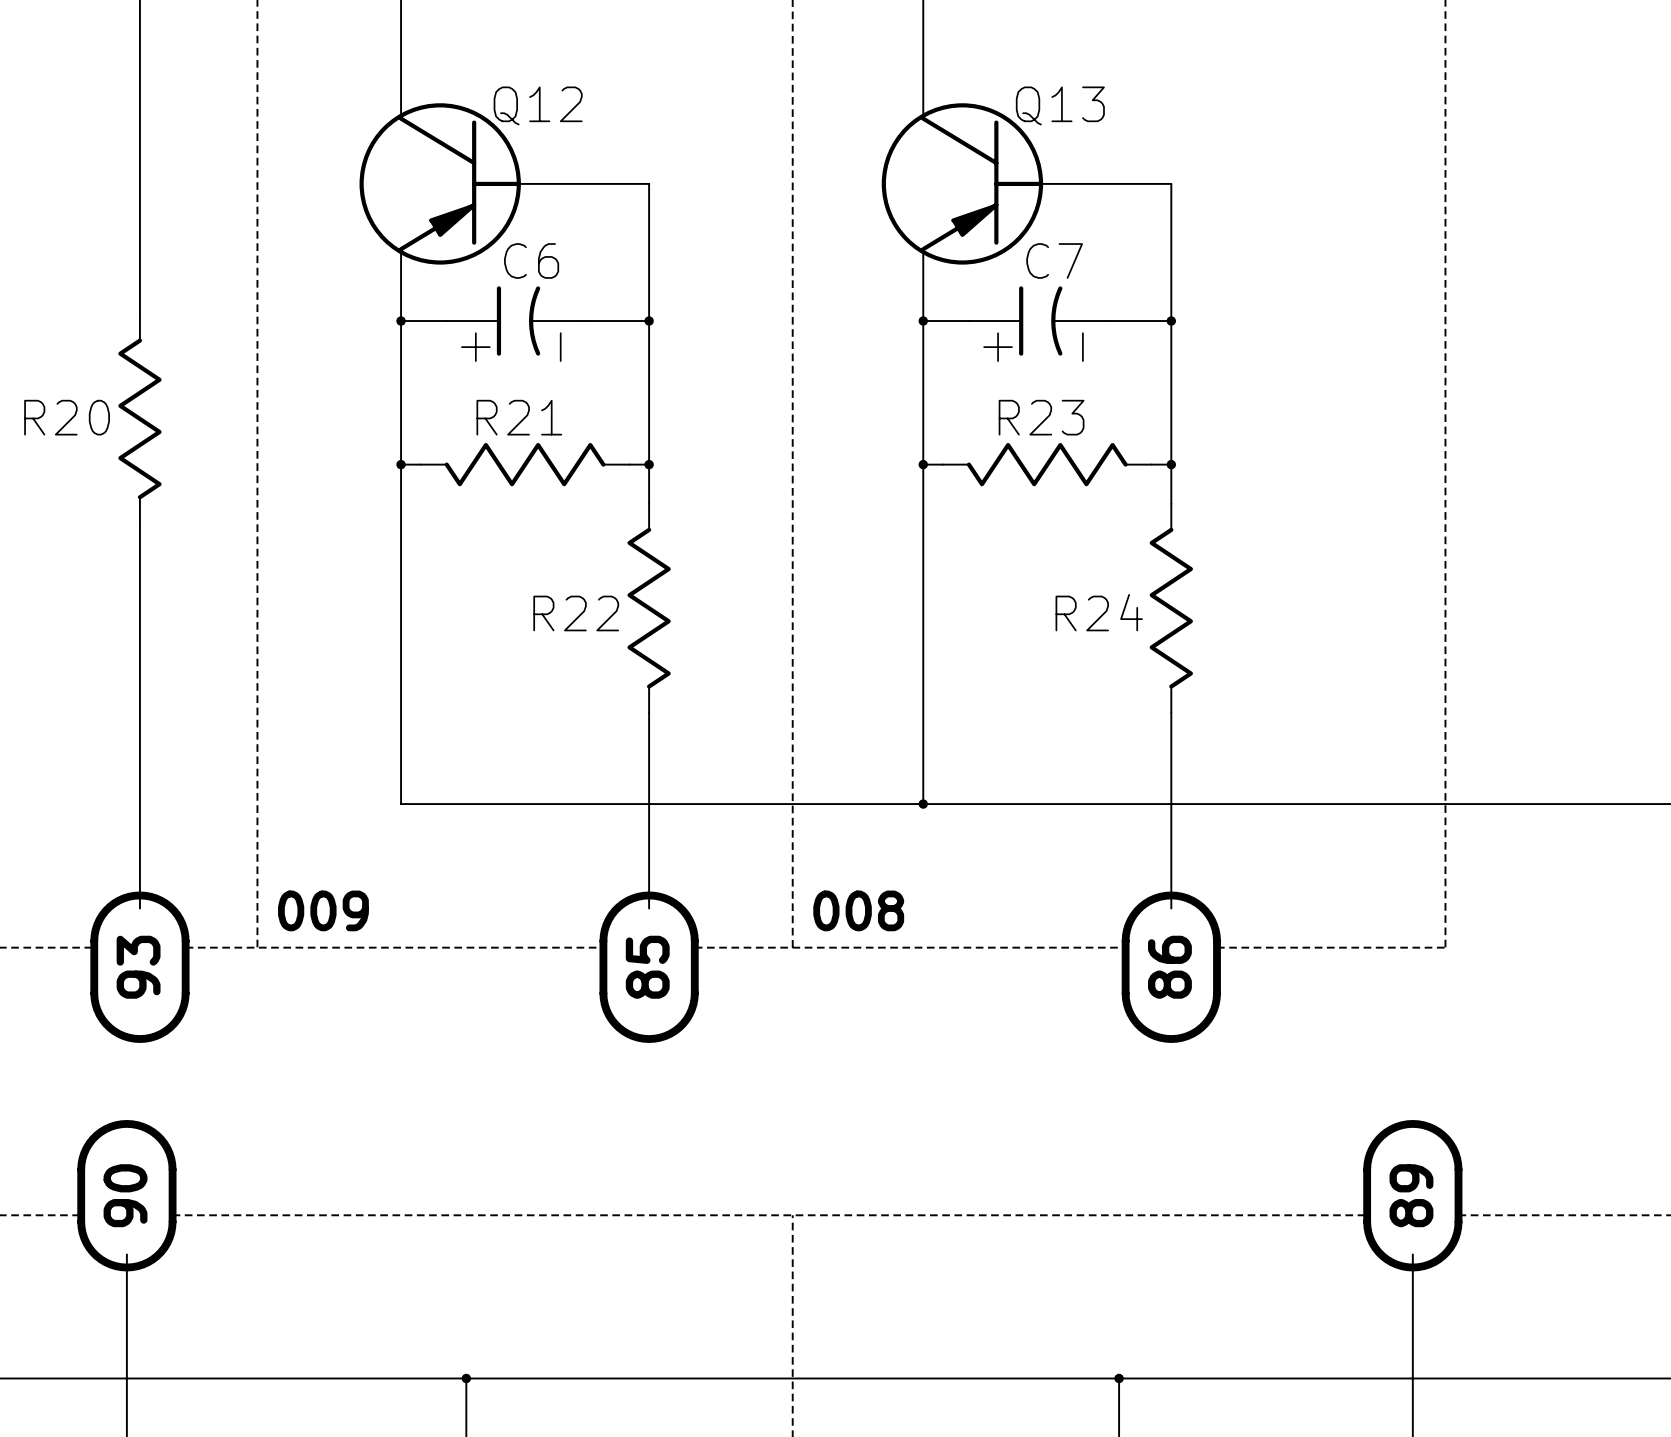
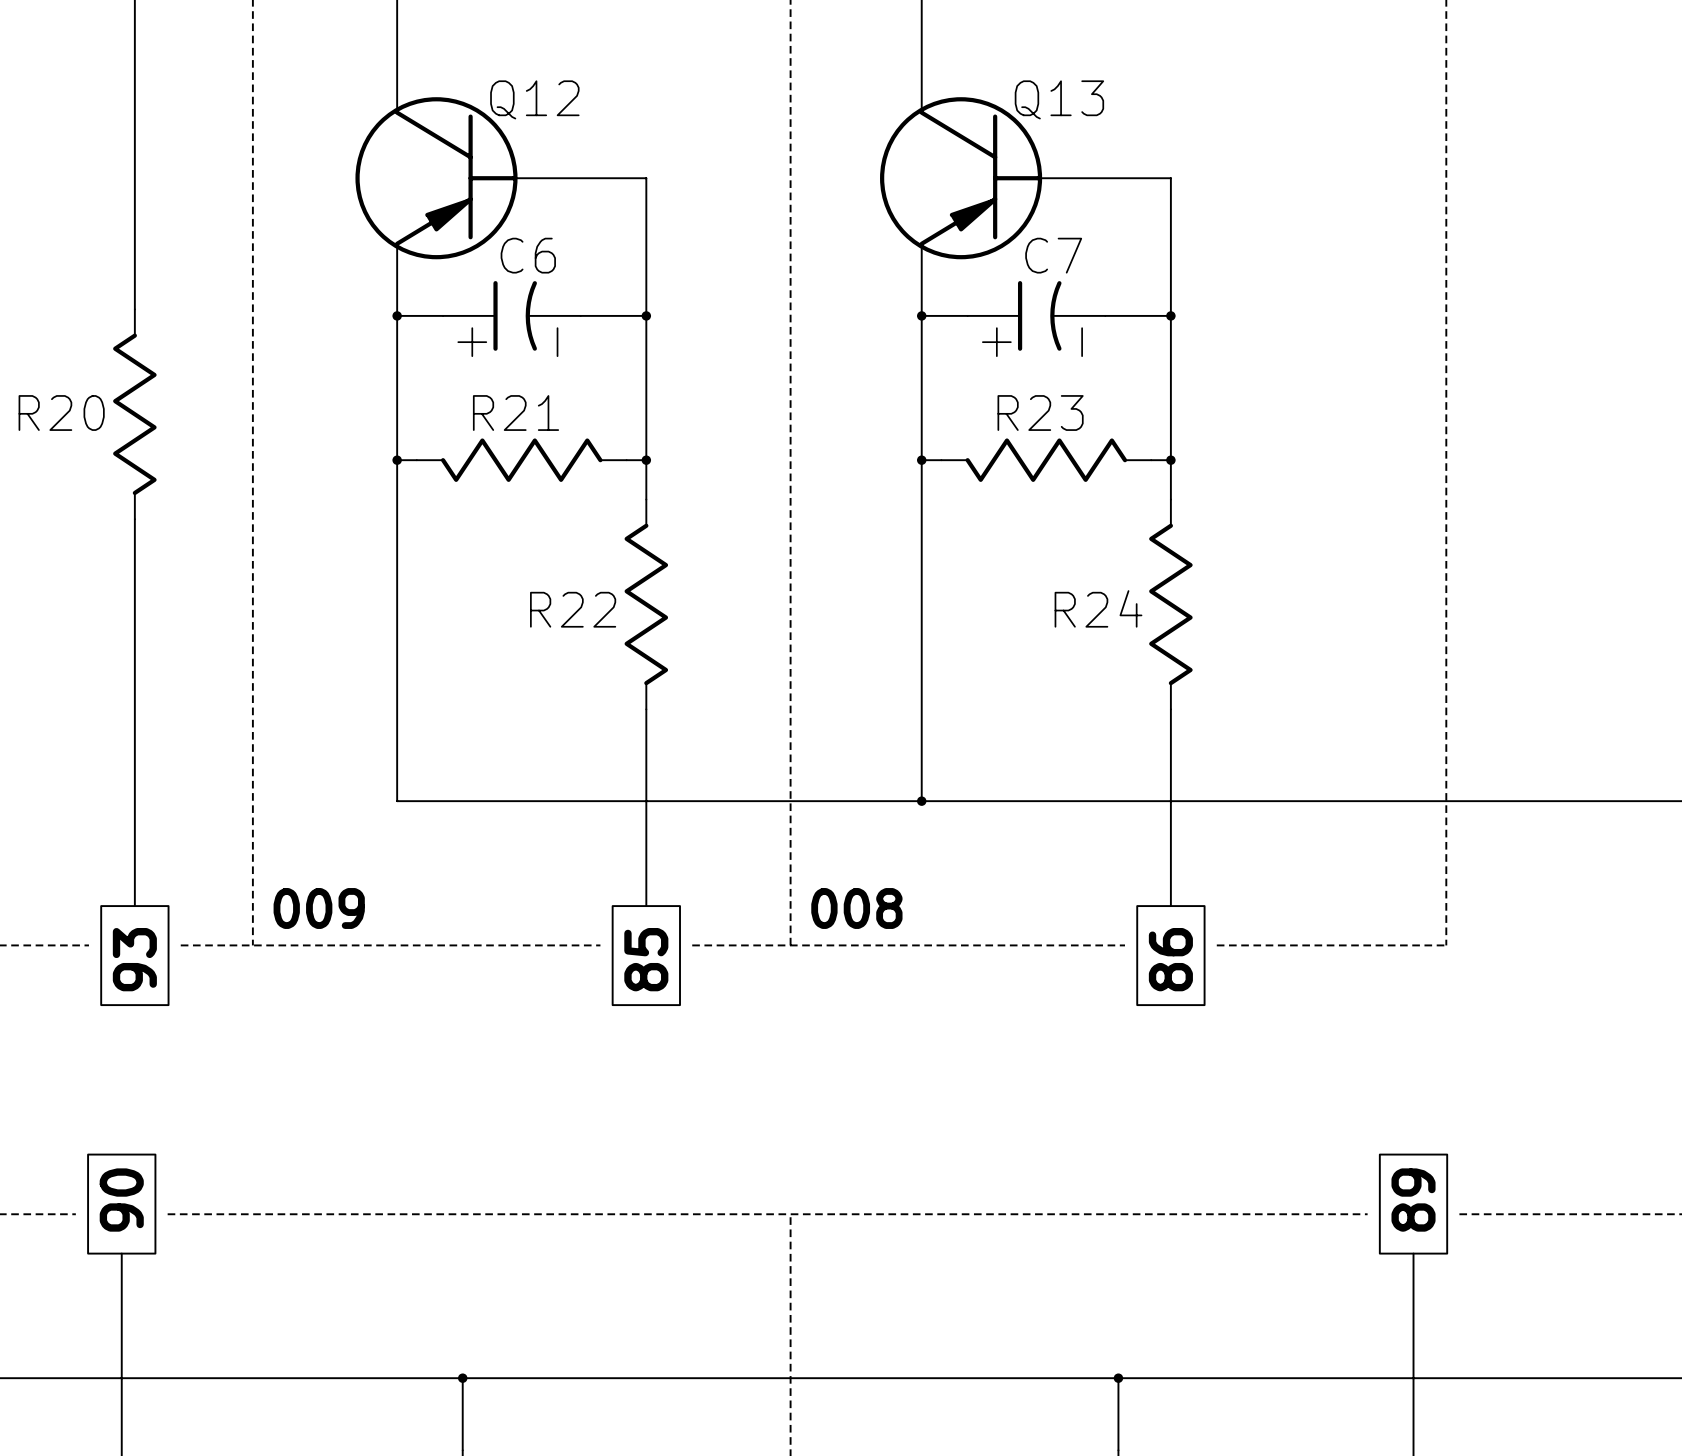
global label: none -> 93 (134, 959)
global label: none -> 85 (646, 959)
global label: none -> 86 (1170, 959)
part: (139, 967) -> none
part: (649, 967) -> none
part: (1171, 967) -> none
part: (126, 1195) -> none
part: (1412, 1195) -> none
global label: none -> 90 (121, 1200)
global label: none -> 89 (1413, 1200)

